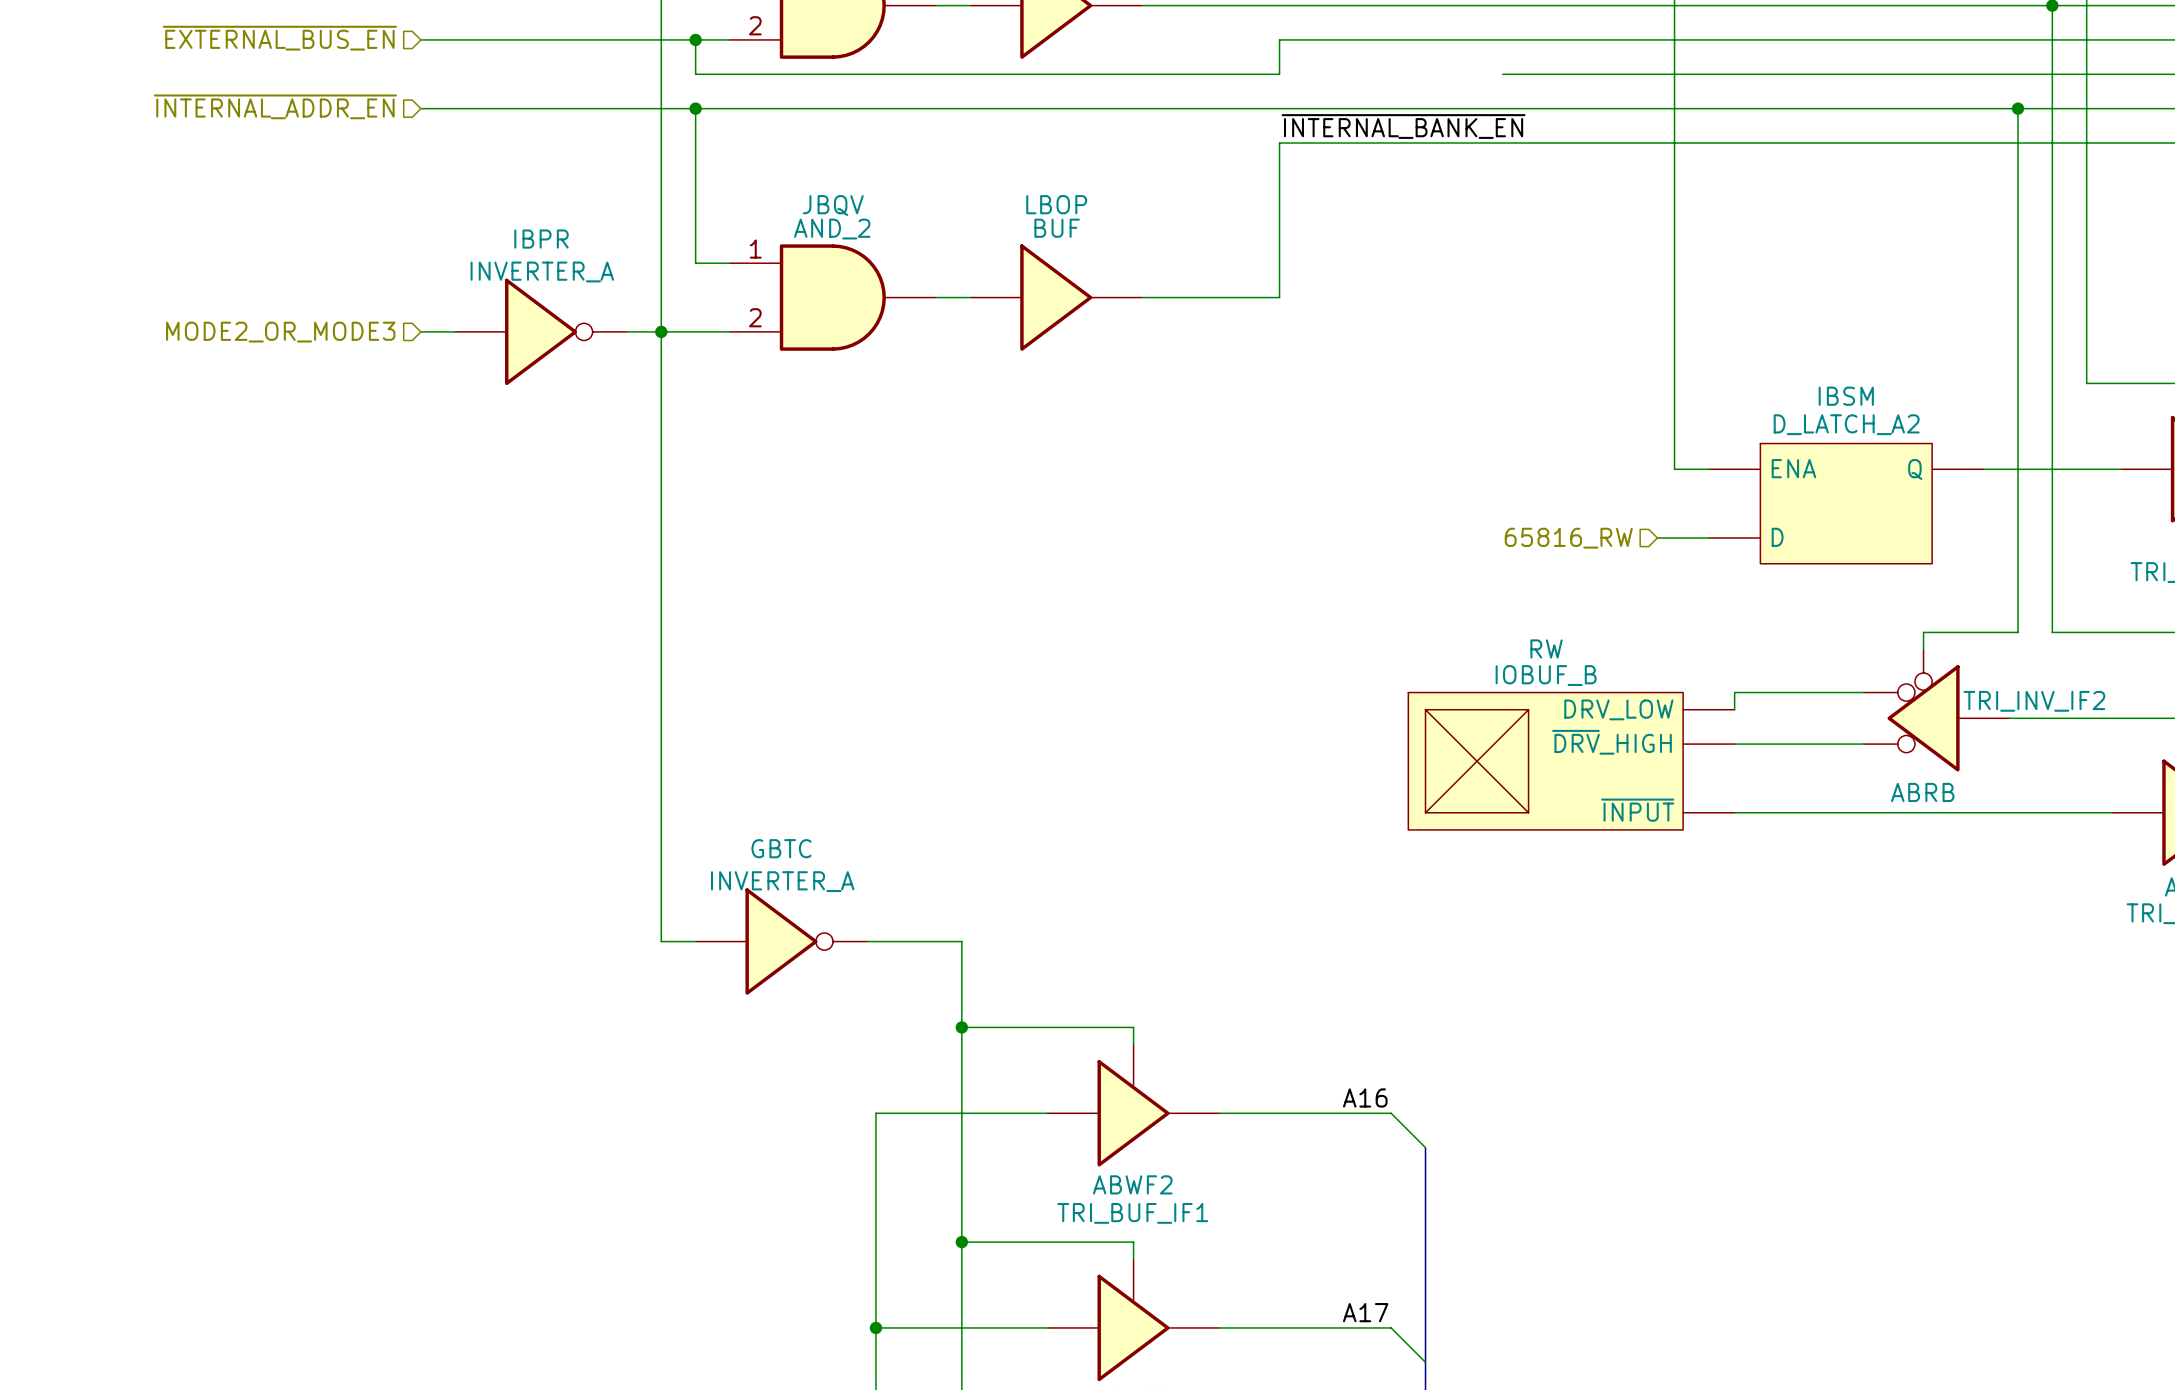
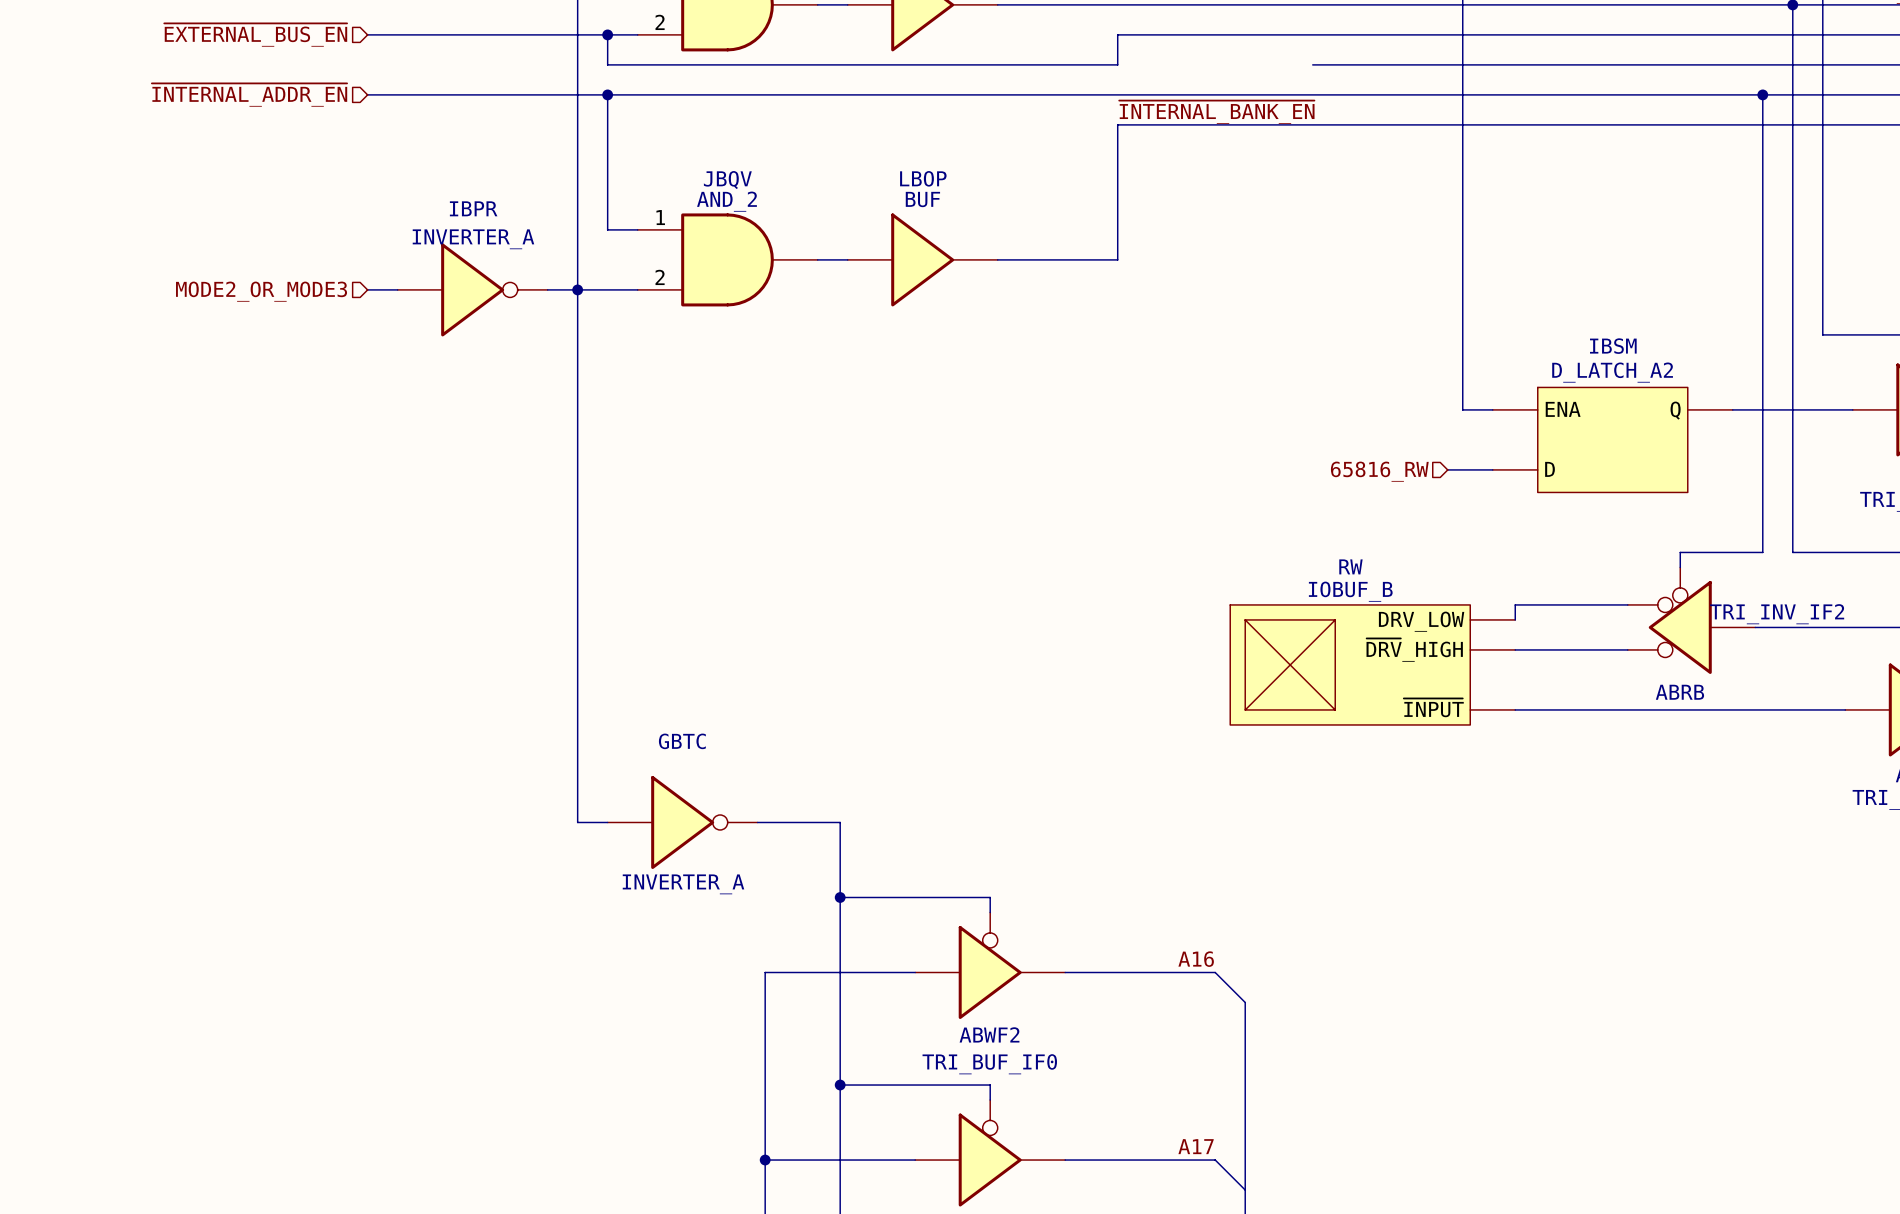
GBTC value position: INVERTER_A (782, 881) -> INVERTER_A (683, 884)
ABWF2 symbol: [1047, 1044, 1220, 1167] -> [915, 912, 1066, 1020]
ABWF2 value: TRI_BUF_IF1 (1132, 1213) -> TRI_BUF_IF0 (989, 1064)
part symbol: [1047, 1259, 1220, 1382] -> [915, 1100, 1066, 1207]

